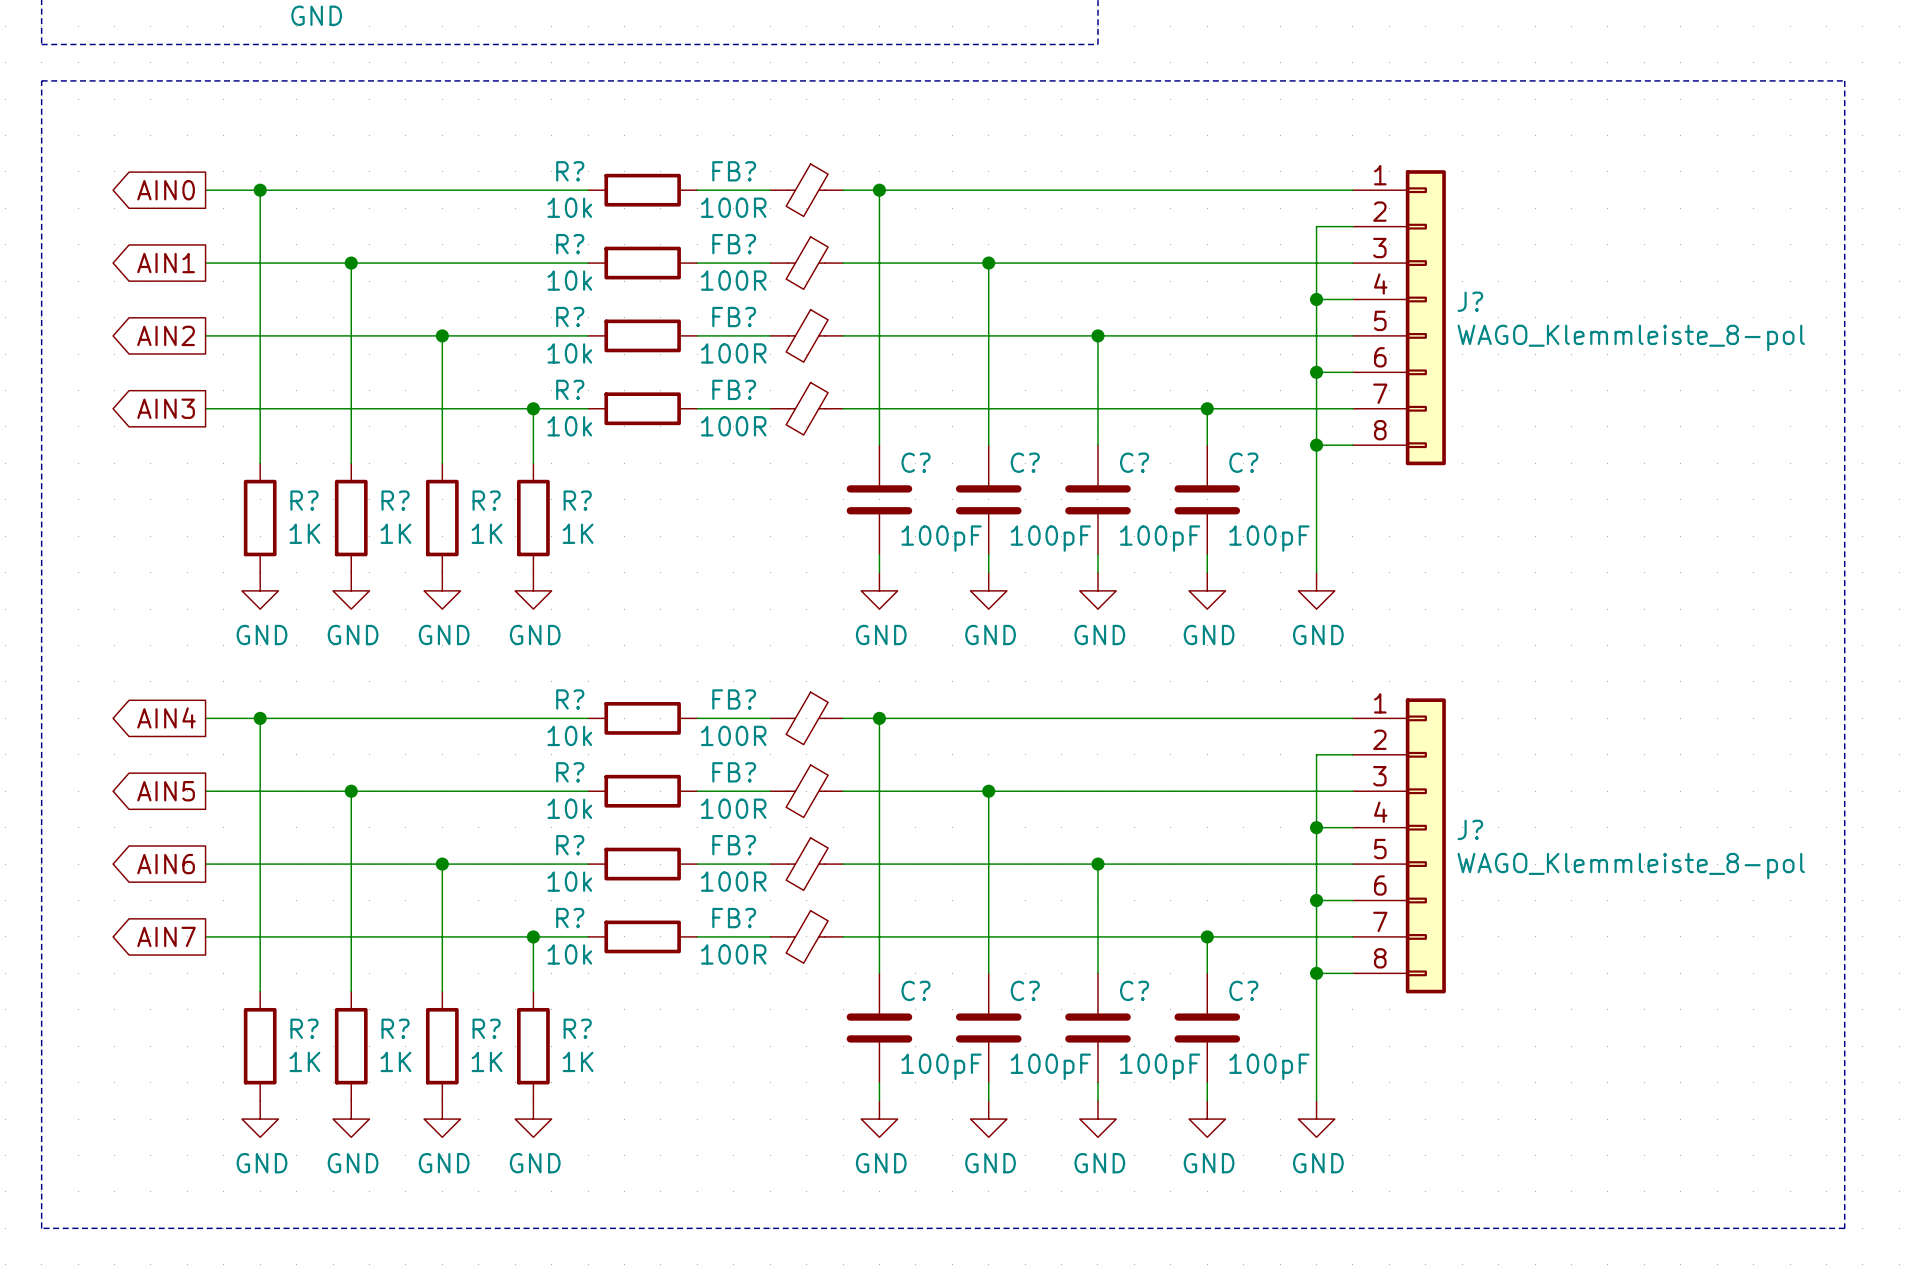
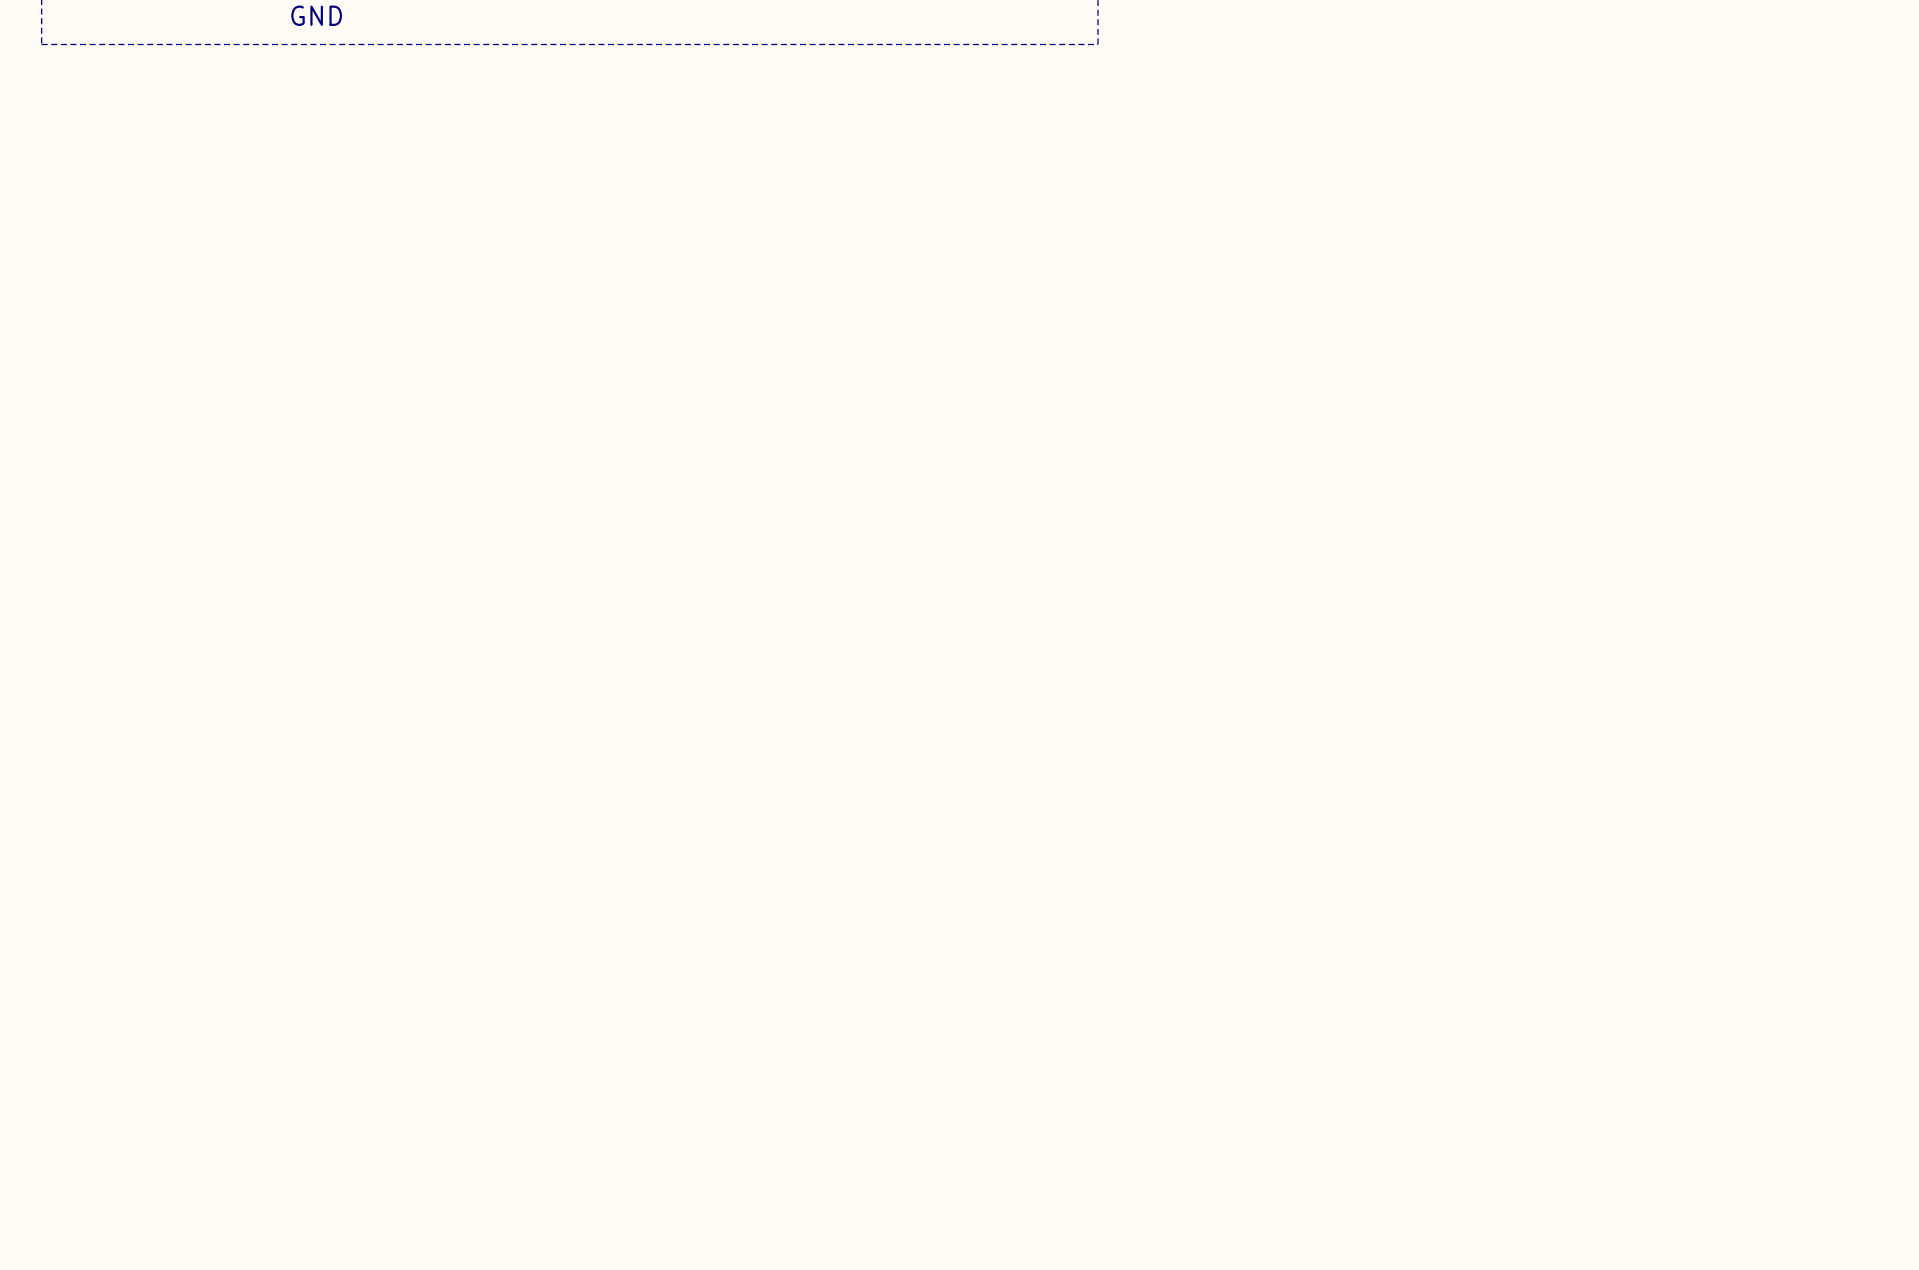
line: (41, 80) (1844, 80) (1844, 1228) (41, 1228) (41, 80) -> none
global label: AIN0 (166, 190) -> none
wire: (205, 190) (588, 190) -> none
wire: (260, 190) (260, 463) -> none
junction: (260, 190) -> none
R?: 10k (642, 190) -> none
wire: (697, 190) (770, 190) -> none
FB?: 100R (806, 190) -> none
wire: (843, 190) (1352, 190) -> none
wire: (879, 190) (879, 445) -> none
junction: (879, 190) -> none
wire: (1352, 226) (1316, 226) (1316, 572) -> none
global label: AIN1 (166, 263) -> none
wire: (205, 263) (588, 263) -> none
wire: (351, 263) (351, 463) -> none
junction: (351, 263) -> none
R?: 10k (642, 263) -> none
wire: (697, 263) (770, 263) -> none
FB?: 100R (806, 263) -> none
wire: (843, 263) (1352, 263) -> none
wire: (988, 263) (988, 445) -> none
junction: (988, 263) -> none
wire: (1316, 299) (1352, 299) -> none
junction: (1316, 299) -> none
J?: WAGO_Klemmleiste_8-pol (1399, 317) -> none
global label: AIN2 (166, 335) -> none
wire: (205, 335) (588, 335) -> none
wire: (442, 335) (442, 463) -> none
junction: (442, 335) -> none
R?: 10k (642, 335) -> none
wire: (697, 335) (770, 335) -> none
FB?: 100R (806, 335) -> none
wire: (843, 335) (1352, 335) -> none
wire: (1097, 335) (1097, 445) -> none
junction: (1097, 335) -> none
wire: (1316, 372) (1352, 372) -> none
junction: (1316, 372) -> none
global label: AIN3 (166, 408) -> none
wire: (205, 408) (588, 408) -> none
wire: (533, 408) (533, 463) -> none
junction: (533, 408) -> none
R?: 10k (642, 408) -> none
wire: (697, 408) (770, 408) -> none
FB?: 100R (806, 408) -> none
wire: (843, 408) (1352, 408) -> none
wire: (1207, 408) (1207, 445) -> none
junction: (1207, 408) -> none
wire: (1316, 445) (1352, 445) -> none
junction: (1316, 445) -> none
C?: 100pF (879, 499) -> none
C?: 100pF (988, 499) -> none
C?: 100pF (1097, 499) -> none
C?: 100pF (1207, 499) -> none
R?: 1K (260, 518) -> none
R?: 1K (351, 518) -> none
R?: 1K (442, 518) -> none
R?: 1K (533, 518) -> none
wire: (879, 554) (879, 572) -> none
wire: (988, 554) (988, 572) -> none
wire: (1097, 554) (1097, 572) -> none
wire: (1207, 554) (1207, 572) -> none
power symbol: GND (260, 590) -> none
power symbol: GND (351, 590) -> none
power symbol: GND (442, 590) -> none
power symbol: GND (533, 590) -> none
power symbol: GND (879, 590) -> none
power symbol: GND (988, 590) -> none
power symbol: GND (1097, 590) -> none
power symbol: GND (1207, 590) -> none
power symbol: GND (1316, 590) -> none
global label: AIN4 (166, 717) -> none
wire: (205, 718) (588, 718) -> none
wire: (260, 718) (260, 991) -> none
junction: (260, 718) -> none
R?: 10k (642, 718) -> none
wire: (697, 718) (770, 718) -> none
FB?: 100R (806, 718) -> none
wire: (843, 718) (1352, 718) -> none
wire: (879, 718) (879, 973) -> none
junction: (879, 718) -> none
wire: (1352, 754) (1316, 754) (1316, 1100) -> none
global label: AIN5 (166, 791) -> none
wire: (205, 791) (588, 791) -> none
wire: (351, 791) (351, 991) -> none
junction: (351, 791) -> none
R?: 10k (642, 791) -> none
wire: (697, 791) (770, 791) -> none
FB?: 100R (806, 791) -> none
wire: (843, 791) (1352, 791) -> none
wire: (988, 791) (988, 973) -> none
junction: (988, 791) -> none
wire: (1316, 827) (1352, 827) -> none
junction: (1316, 827) -> none
J?: WAGO_Klemmleiste_8-pol (1399, 845) -> none
global label: AIN6 (166, 864) -> none
wire: (205, 864) (588, 864) -> none
wire: (442, 864) (442, 991) -> none
junction: (442, 864) -> none
R?: 10k (642, 864) -> none
wire: (697, 864) (770, 864) -> none
FB?: 100R (806, 864) -> none
wire: (843, 864) (1352, 864) -> none
wire: (1097, 864) (1097, 973) -> none
junction: (1097, 864) -> none
wire: (1316, 900) (1352, 900) -> none
junction: (1316, 900) -> none
global label: AIN7 (166, 936) -> none
wire: (205, 936) (588, 936) -> none
wire: (533, 936) (533, 991) -> none
junction: (533, 936) -> none
R?: 10k (642, 936) -> none
wire: (697, 936) (770, 936) -> none
FB?: 100R (806, 936) -> none
wire: (843, 936) (1352, 936) -> none
wire: (1207, 936) (1207, 973) -> none
junction: (1207, 936) -> none
wire: (1316, 973) (1352, 973) -> none
junction: (1316, 973) -> none
C?: 100pF (879, 1028) -> none
C?: 100pF (988, 1028) -> none
C?: 100pF (1097, 1028) -> none
C?: 100pF (1207, 1028) -> none
R?: 1K (260, 1046) -> none
R?: 1K (351, 1046) -> none
R?: 1K (442, 1046) -> none
R?: 1K (533, 1046) -> none
wire: (879, 1082) (879, 1100) -> none
wire: (988, 1082) (988, 1100) -> none
wire: (1097, 1082) (1097, 1100) -> none
wire: (1207, 1082) (1207, 1100) -> none
power symbol: GND (260, 1119) -> none
power symbol: GND (351, 1119) -> none
power symbol: GND (442, 1119) -> none
power symbol: GND (533, 1119) -> none
power symbol: GND (879, 1119) -> none
power symbol: GND (988, 1119) -> none
power symbol: GND (1097, 1119) -> none
power symbol: GND (1207, 1119) -> none
power symbol: GND (1316, 1119) -> none

